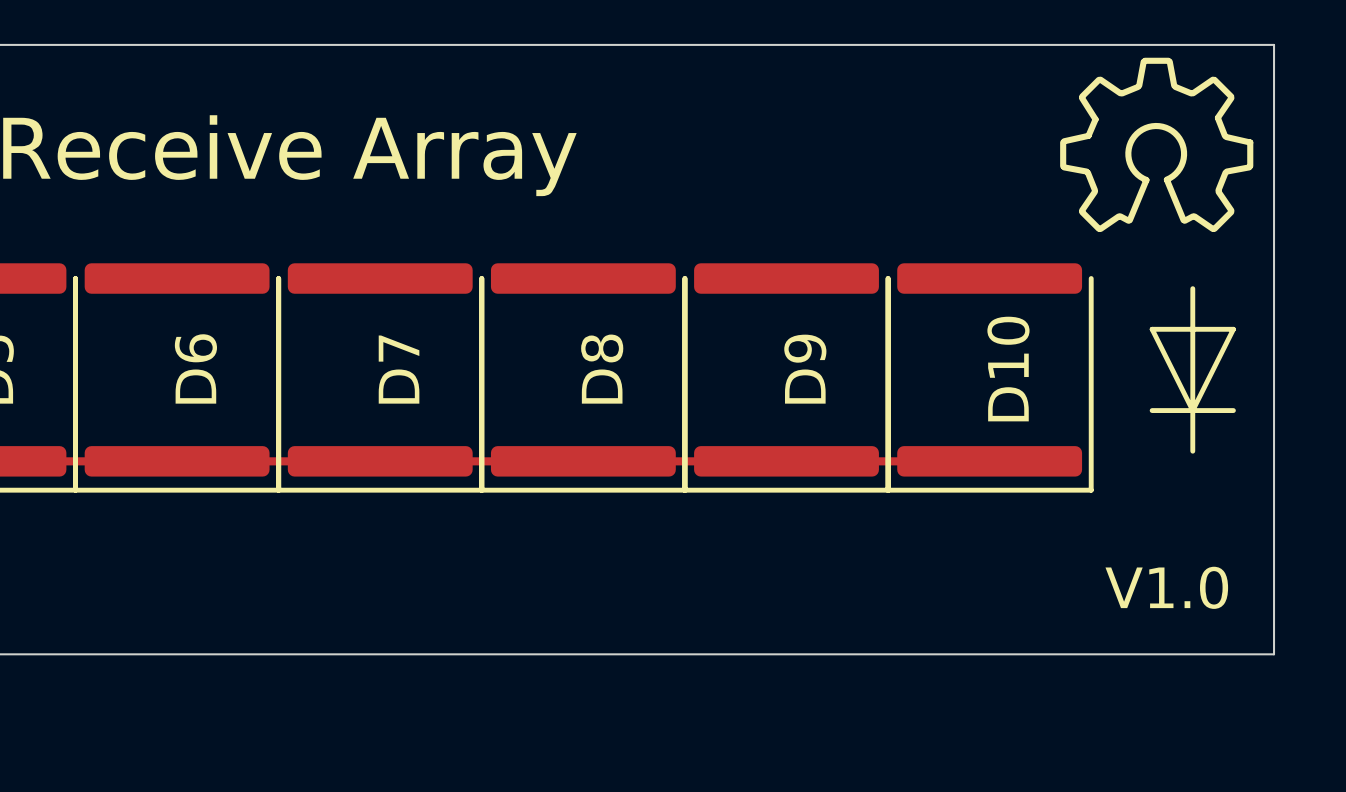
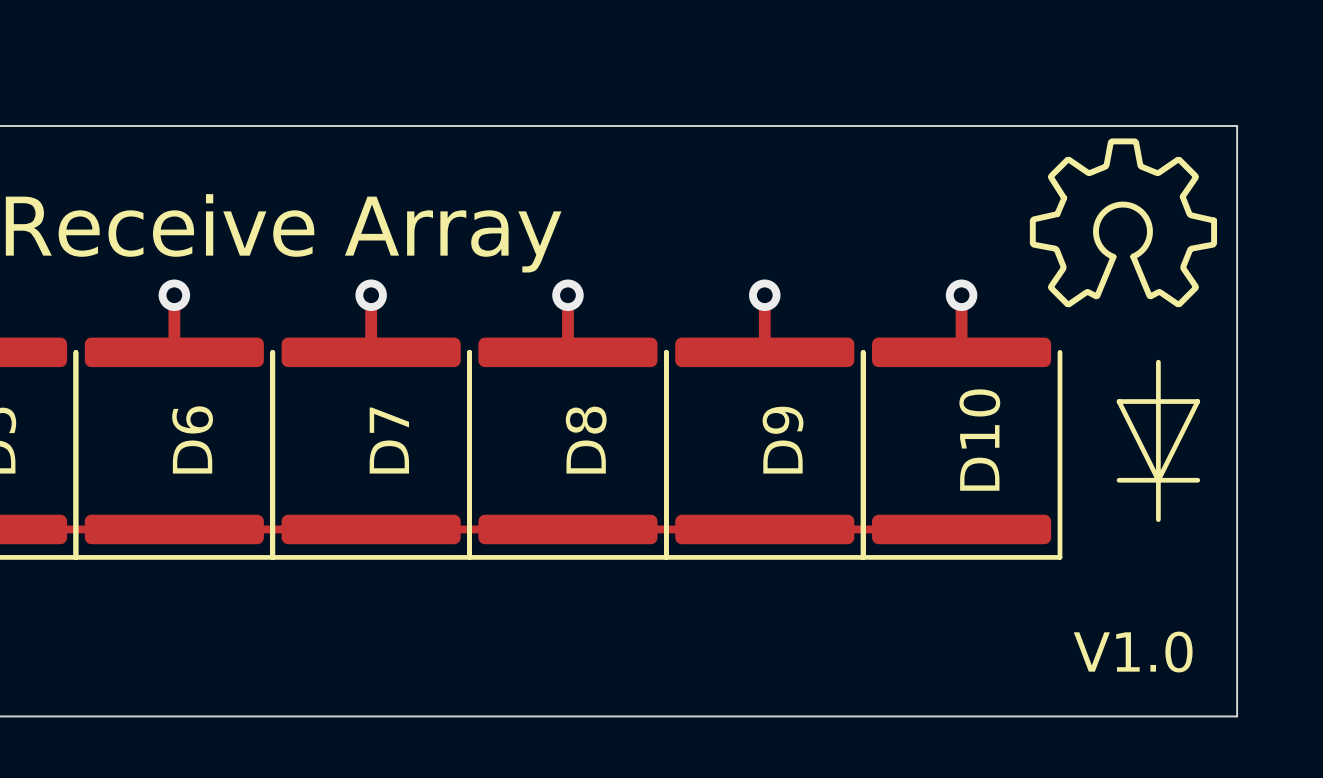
track: none -> (174, 295) (174, 348)
via: none -> (174, 295)
track: none -> (371, 295) (371, 348)
via: none -> (371, 295)
track: none -> (567, 295) (567, 348)
via: none -> (567, 295)
track: none -> (764, 295) (764, 348)
via: none -> (764, 295)
track: none -> (961, 295) (961, 348)
via: none -> (961, 295)

